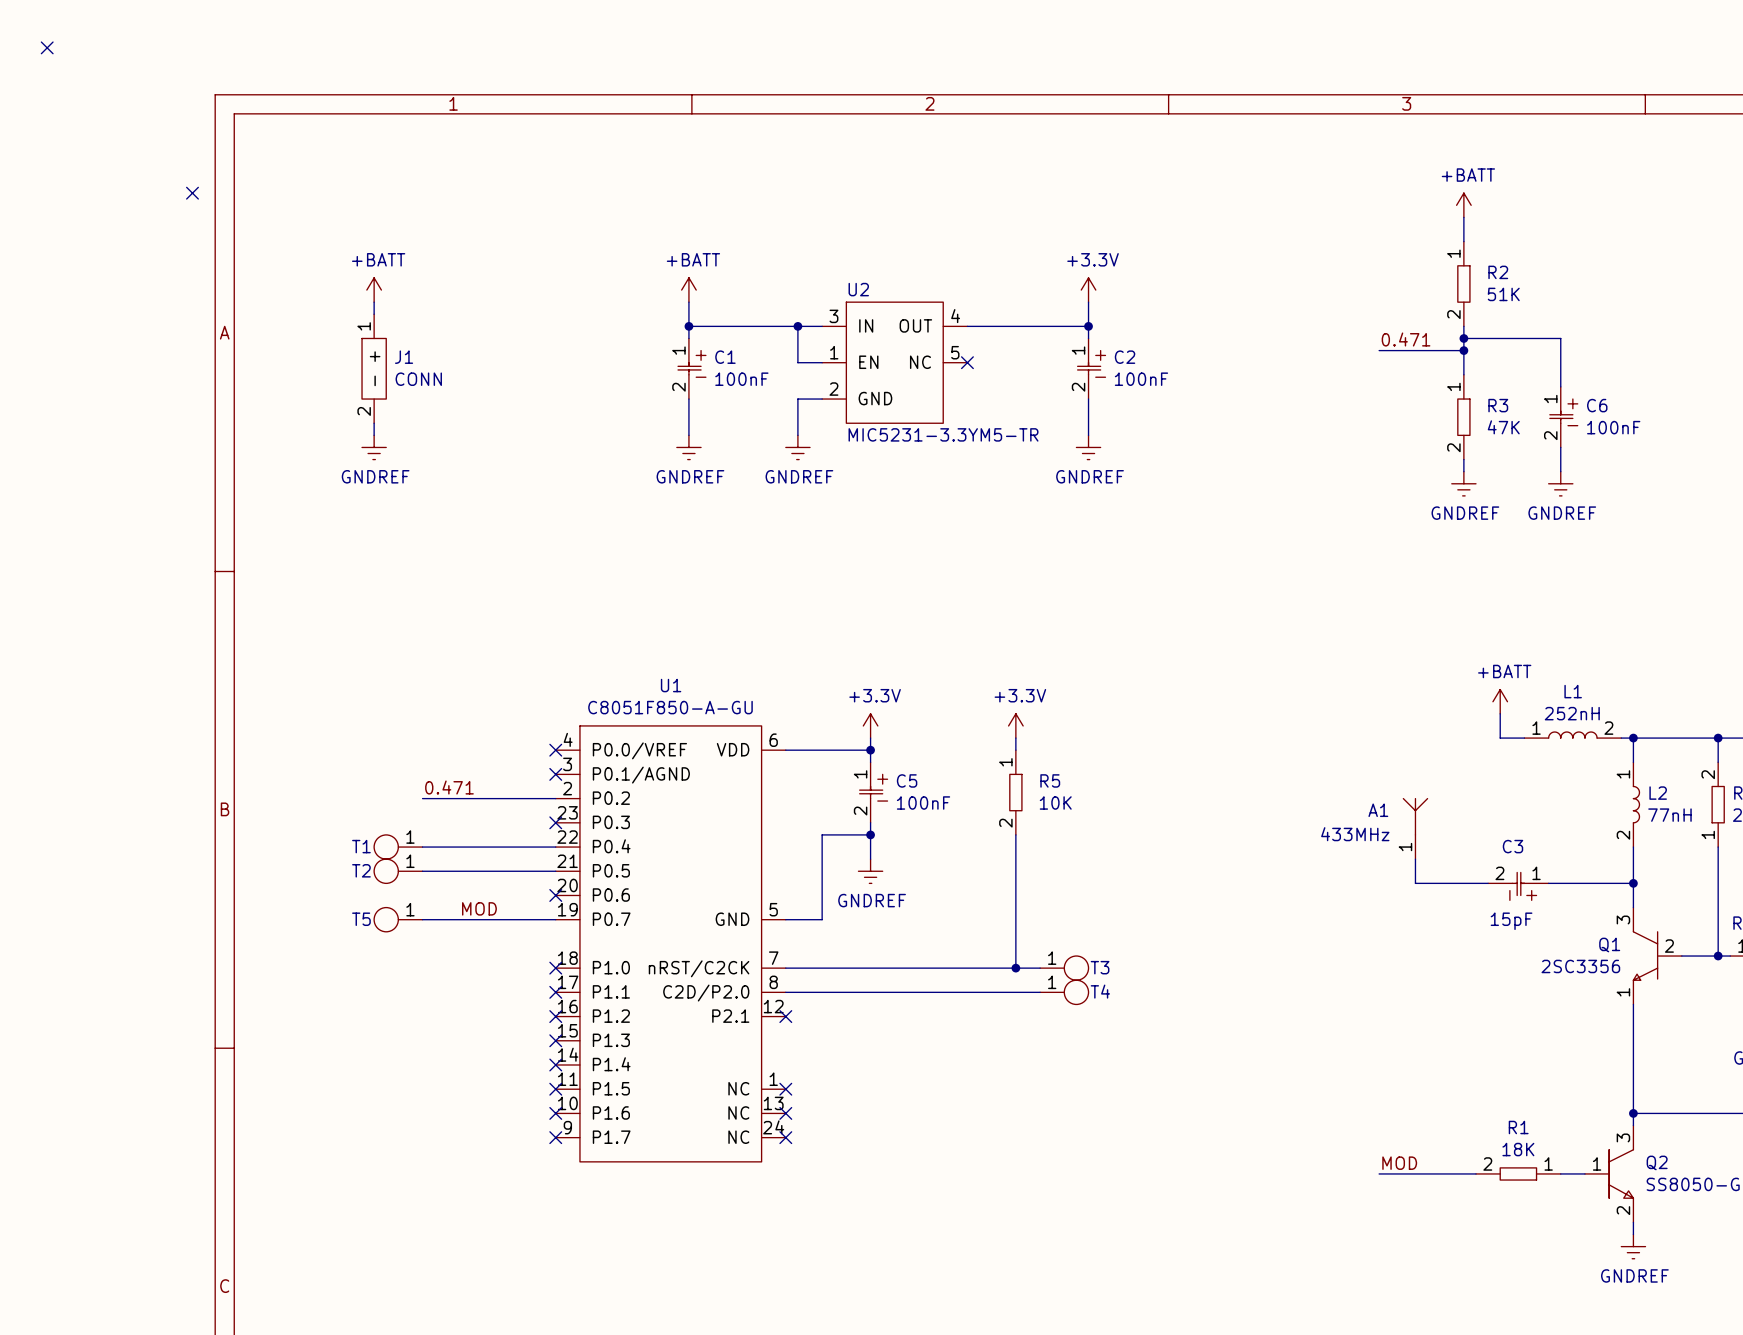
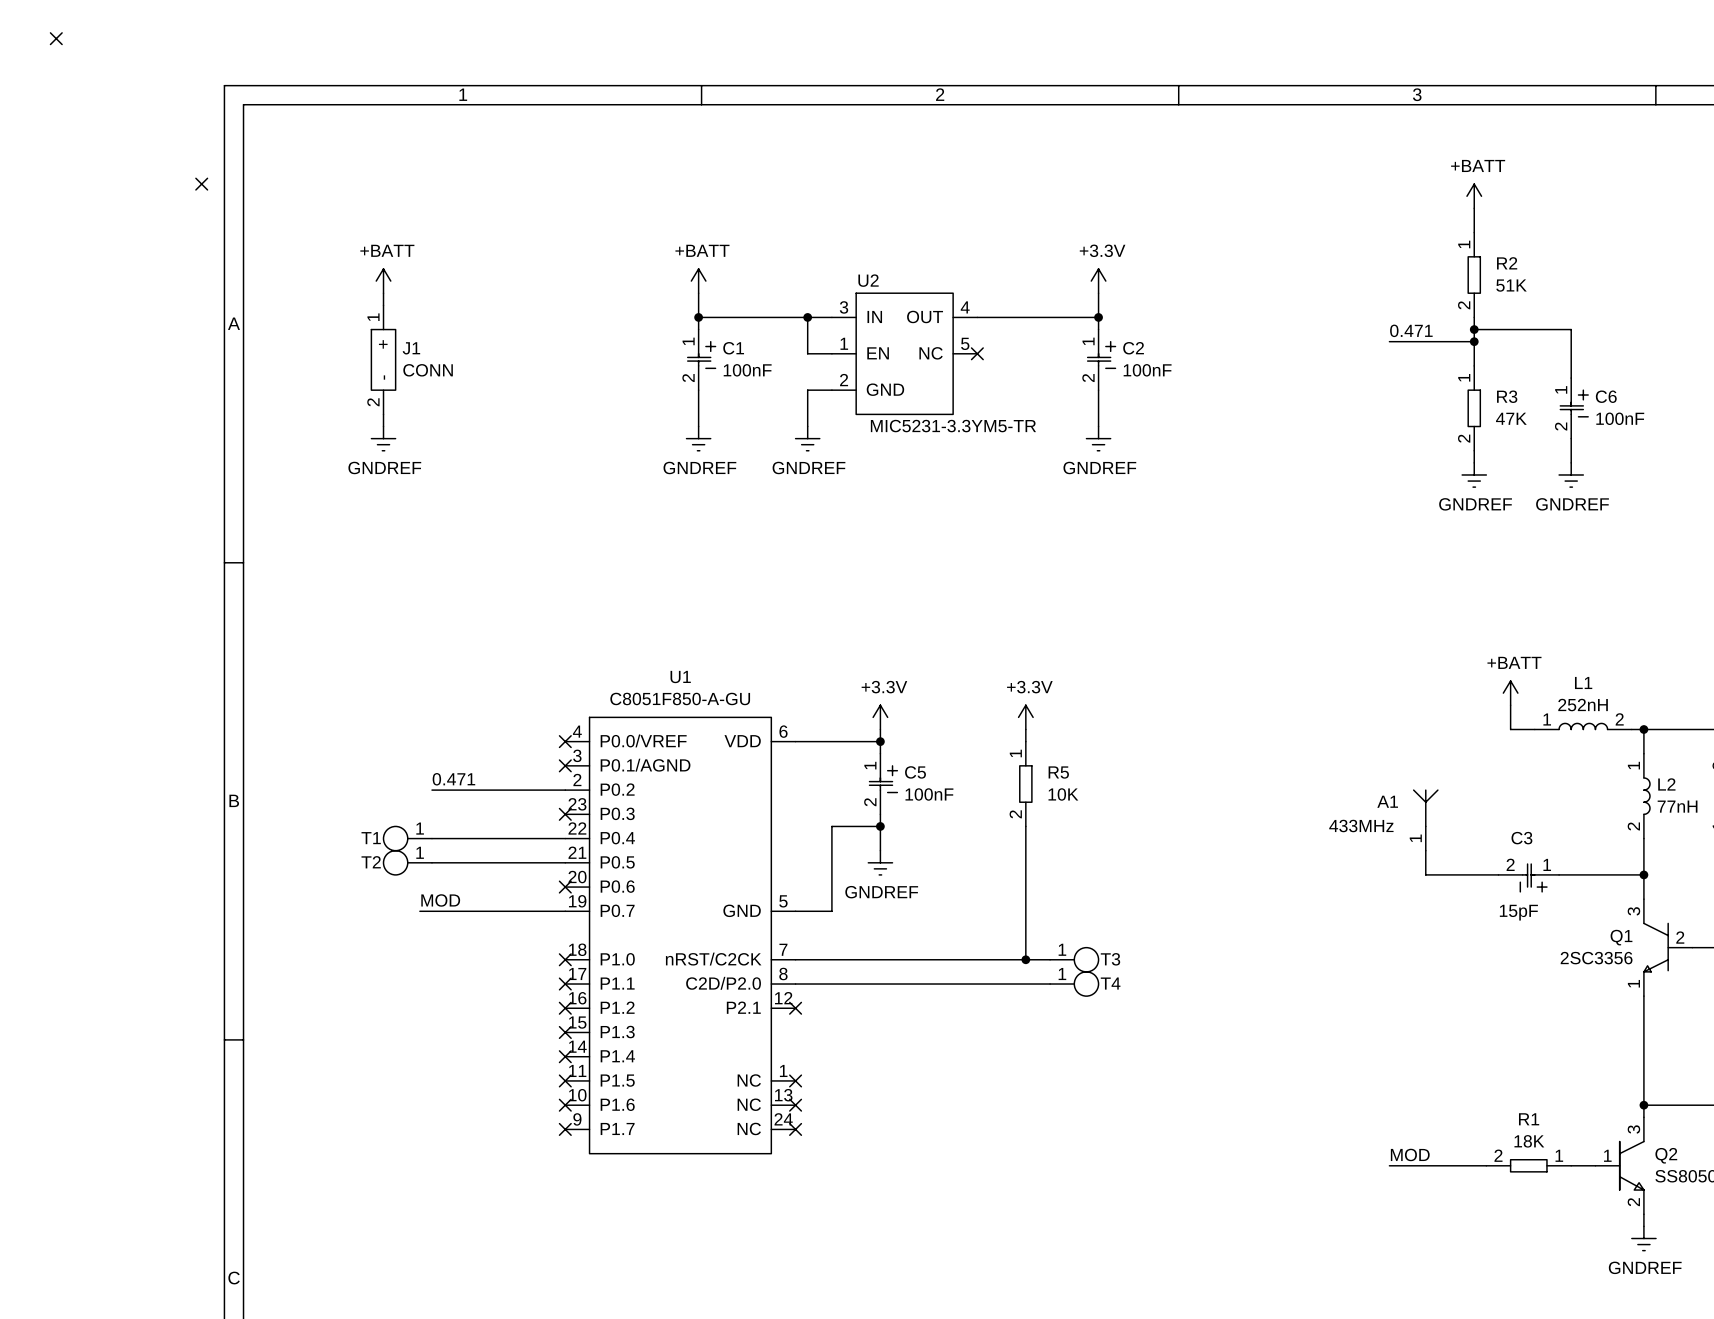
label position: MOD (479, 908) -> MOD (440, 900)
T5: (398, 919) -> none

